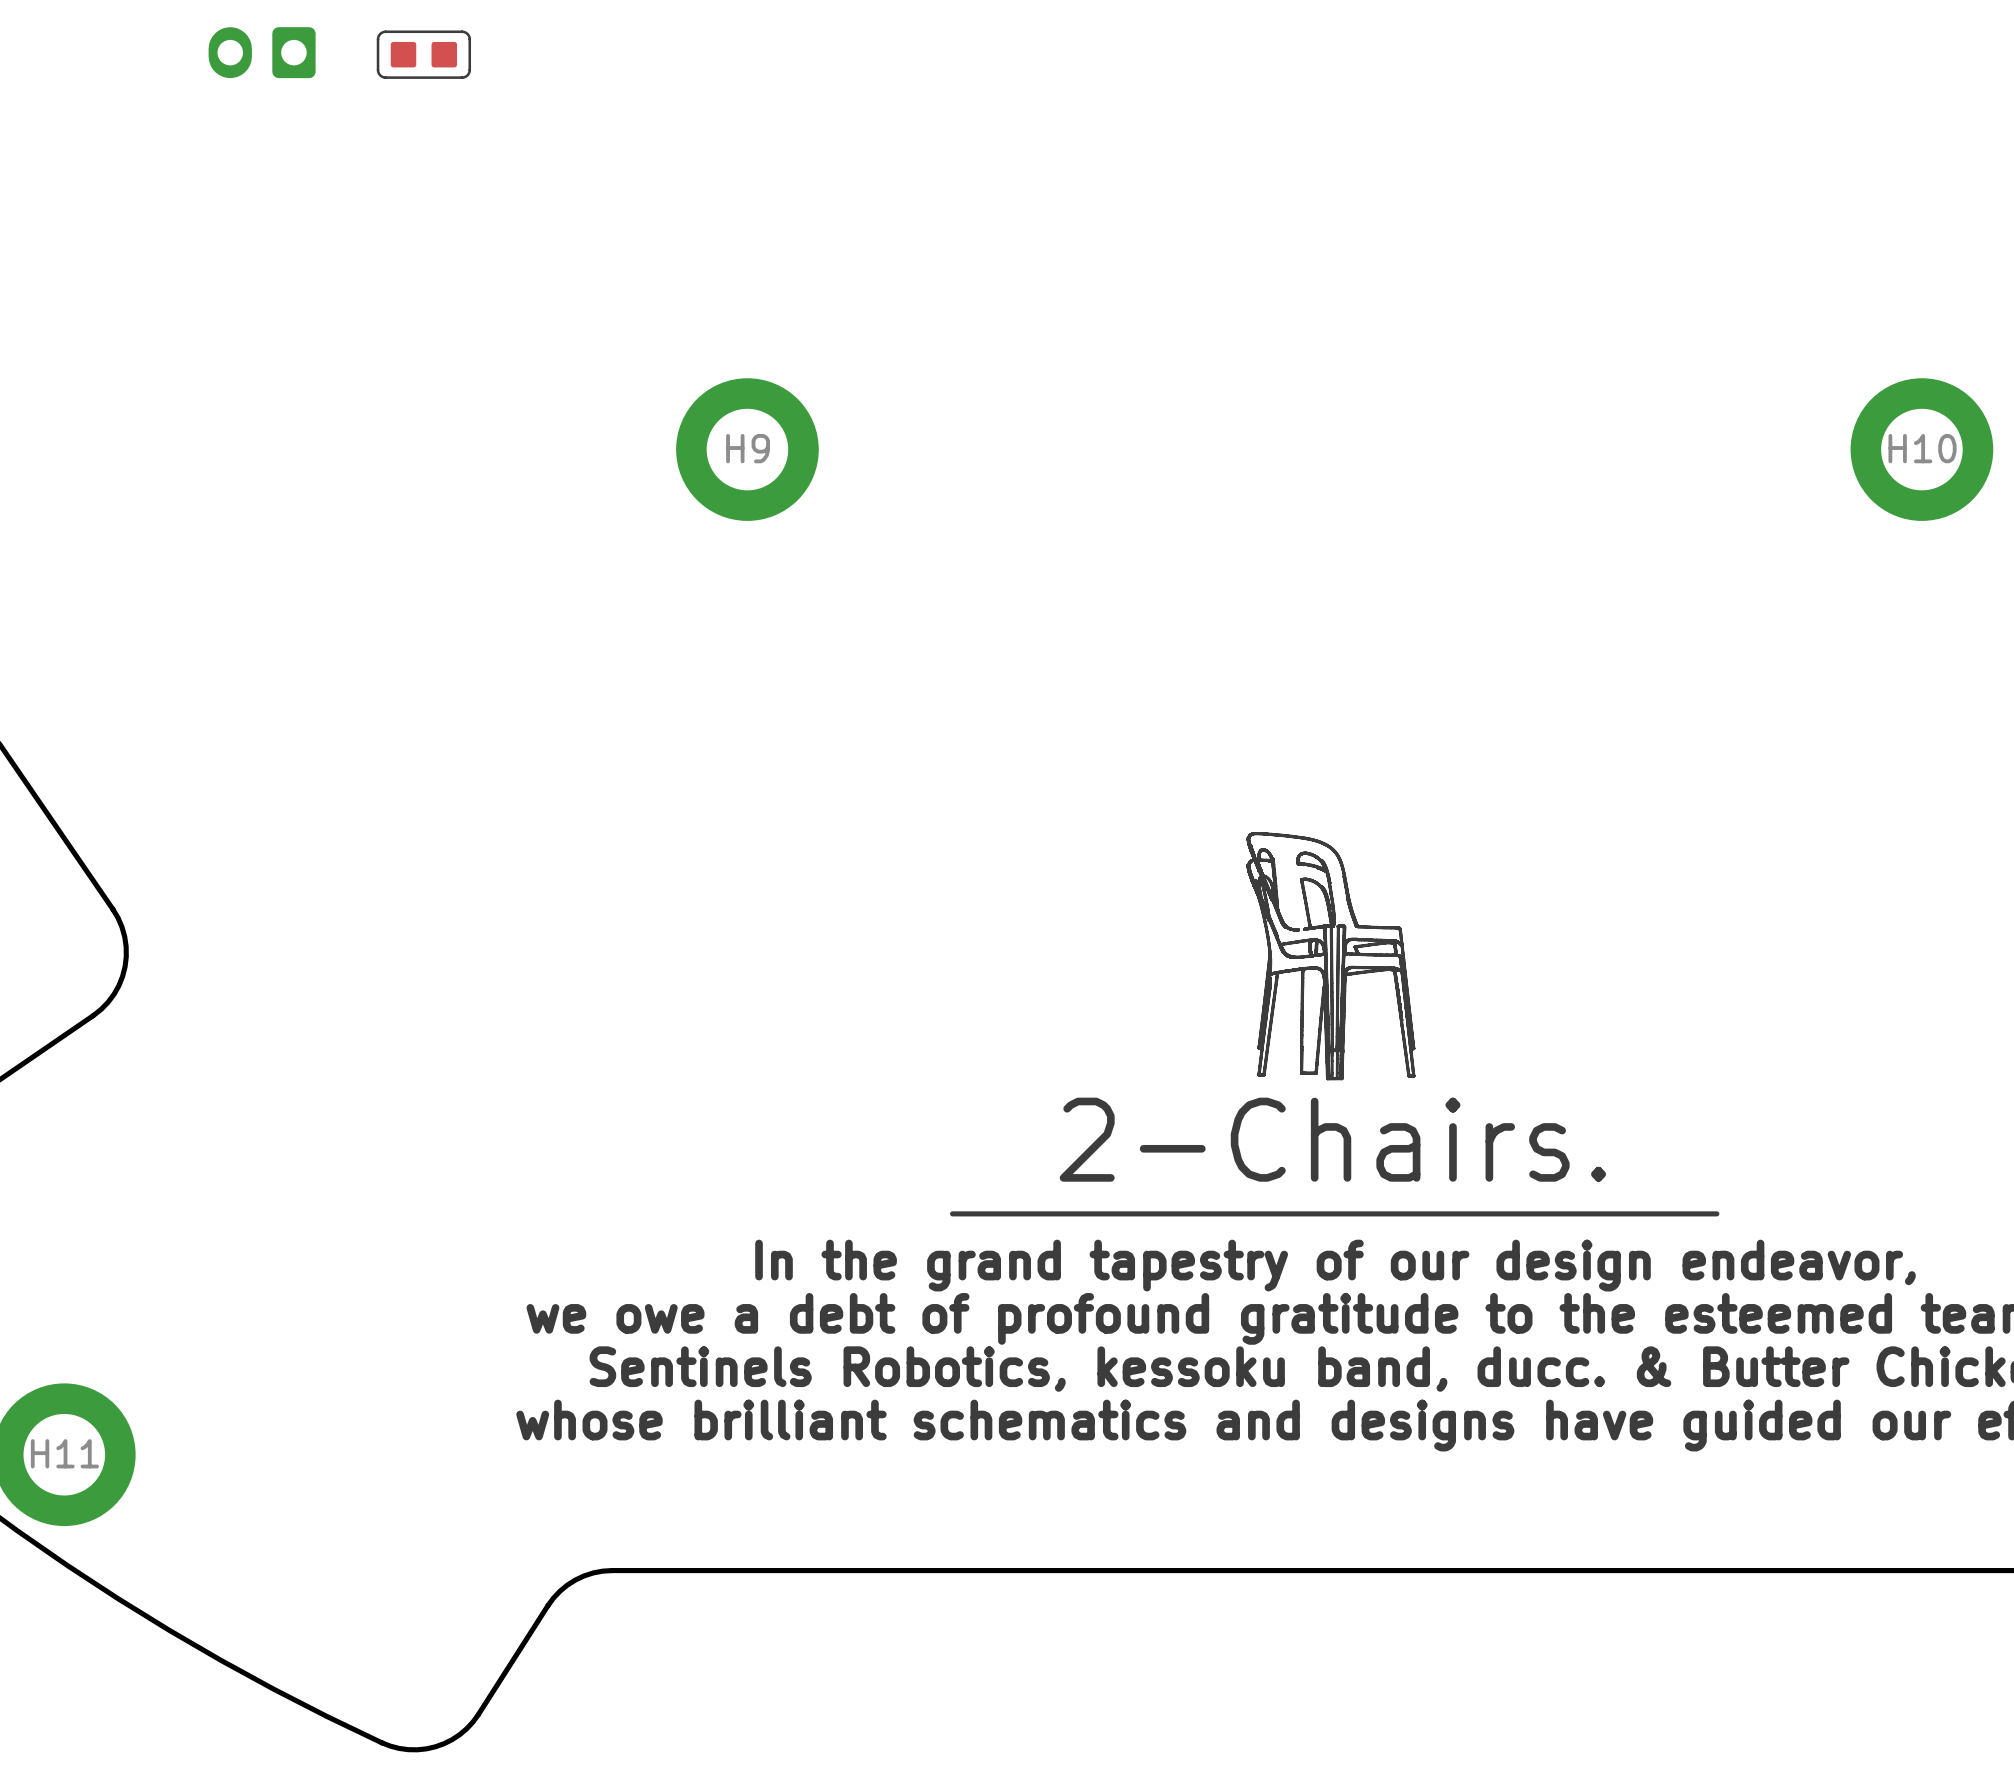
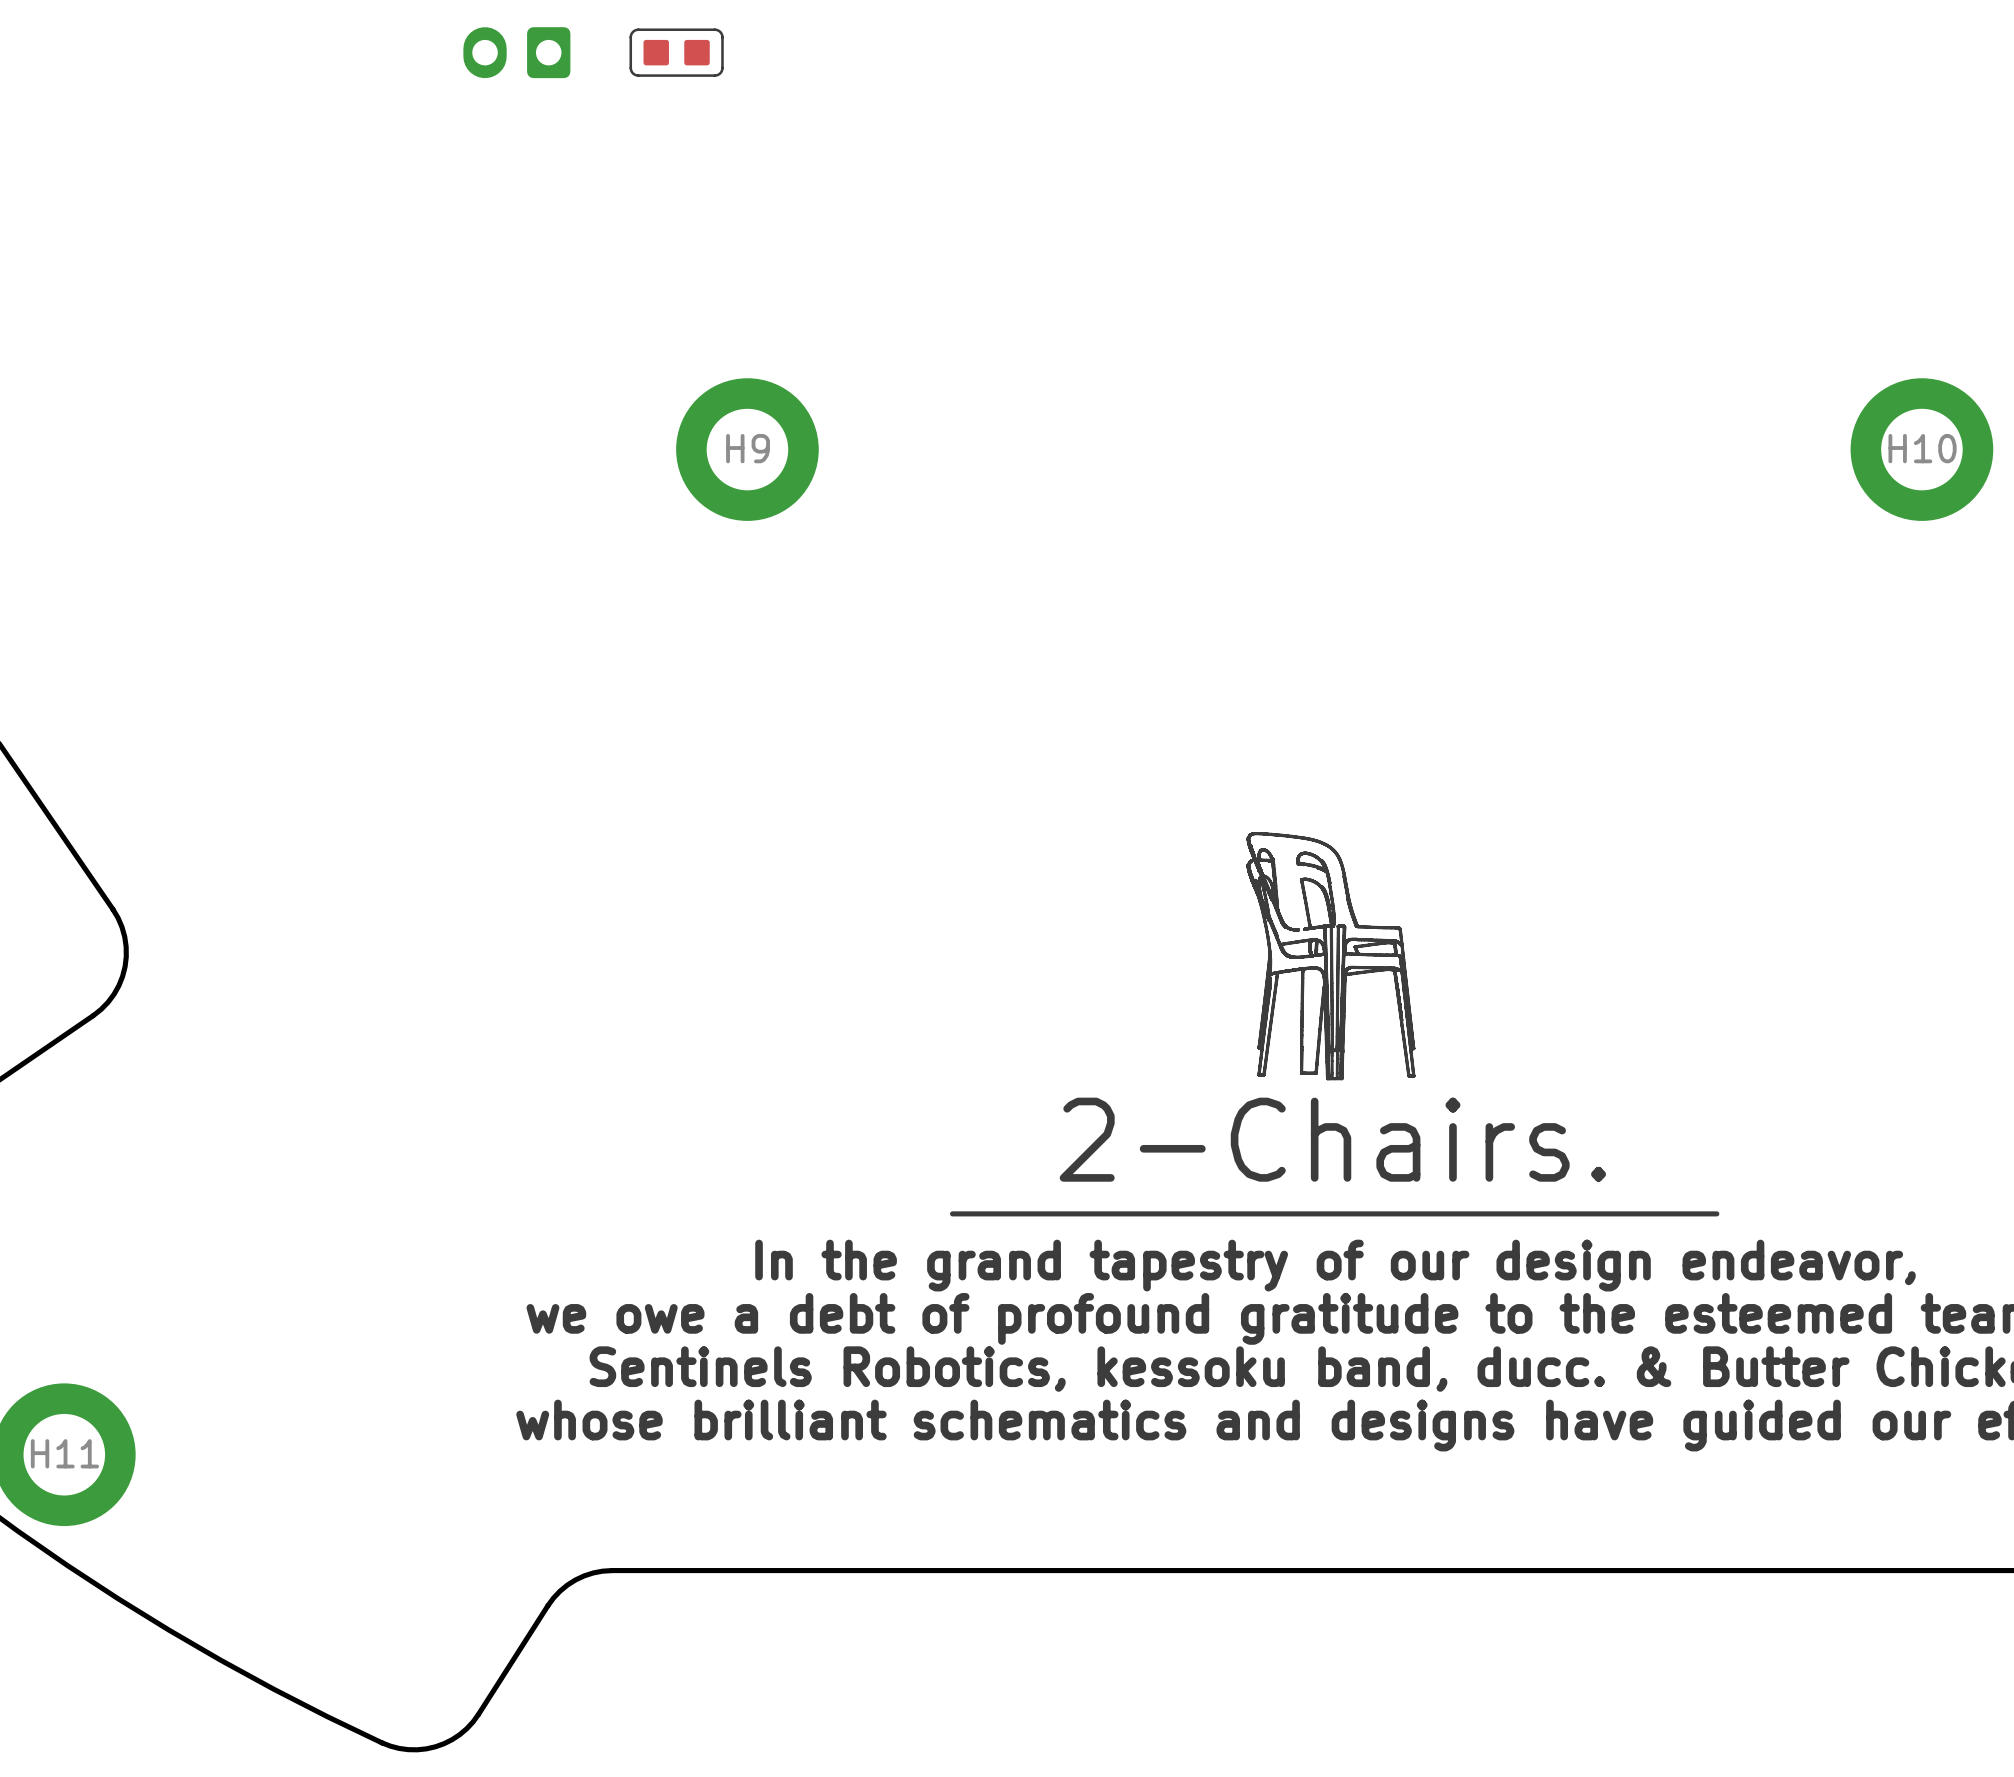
part position: (262, 52) -> (516, 52)
part position: (423, 54) -> (676, 52)

